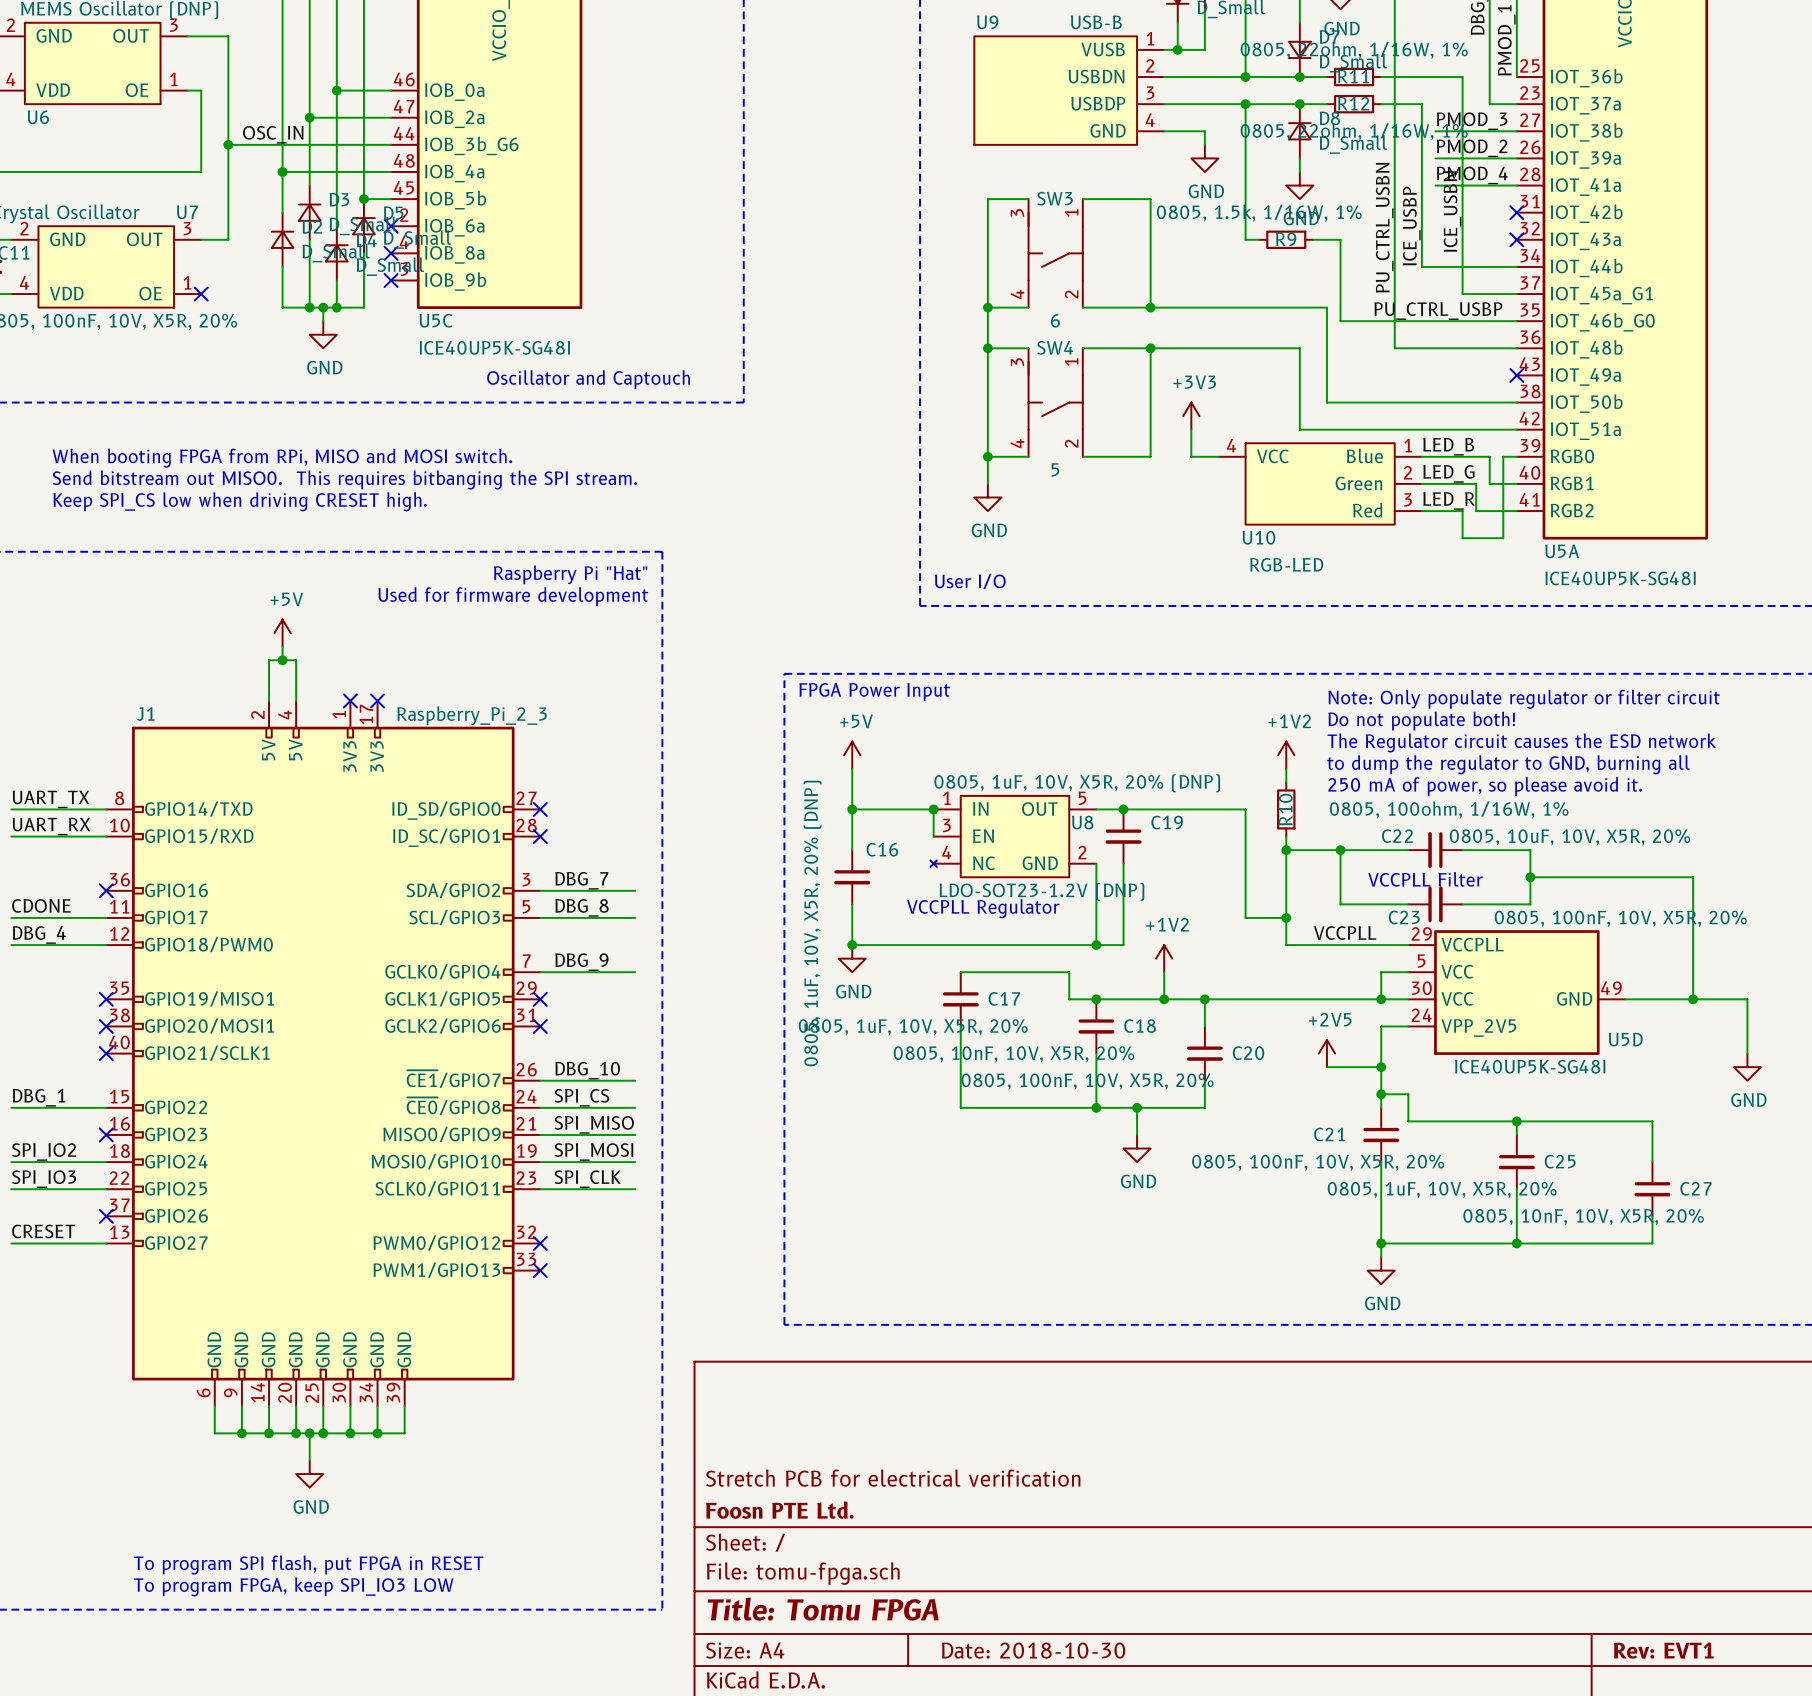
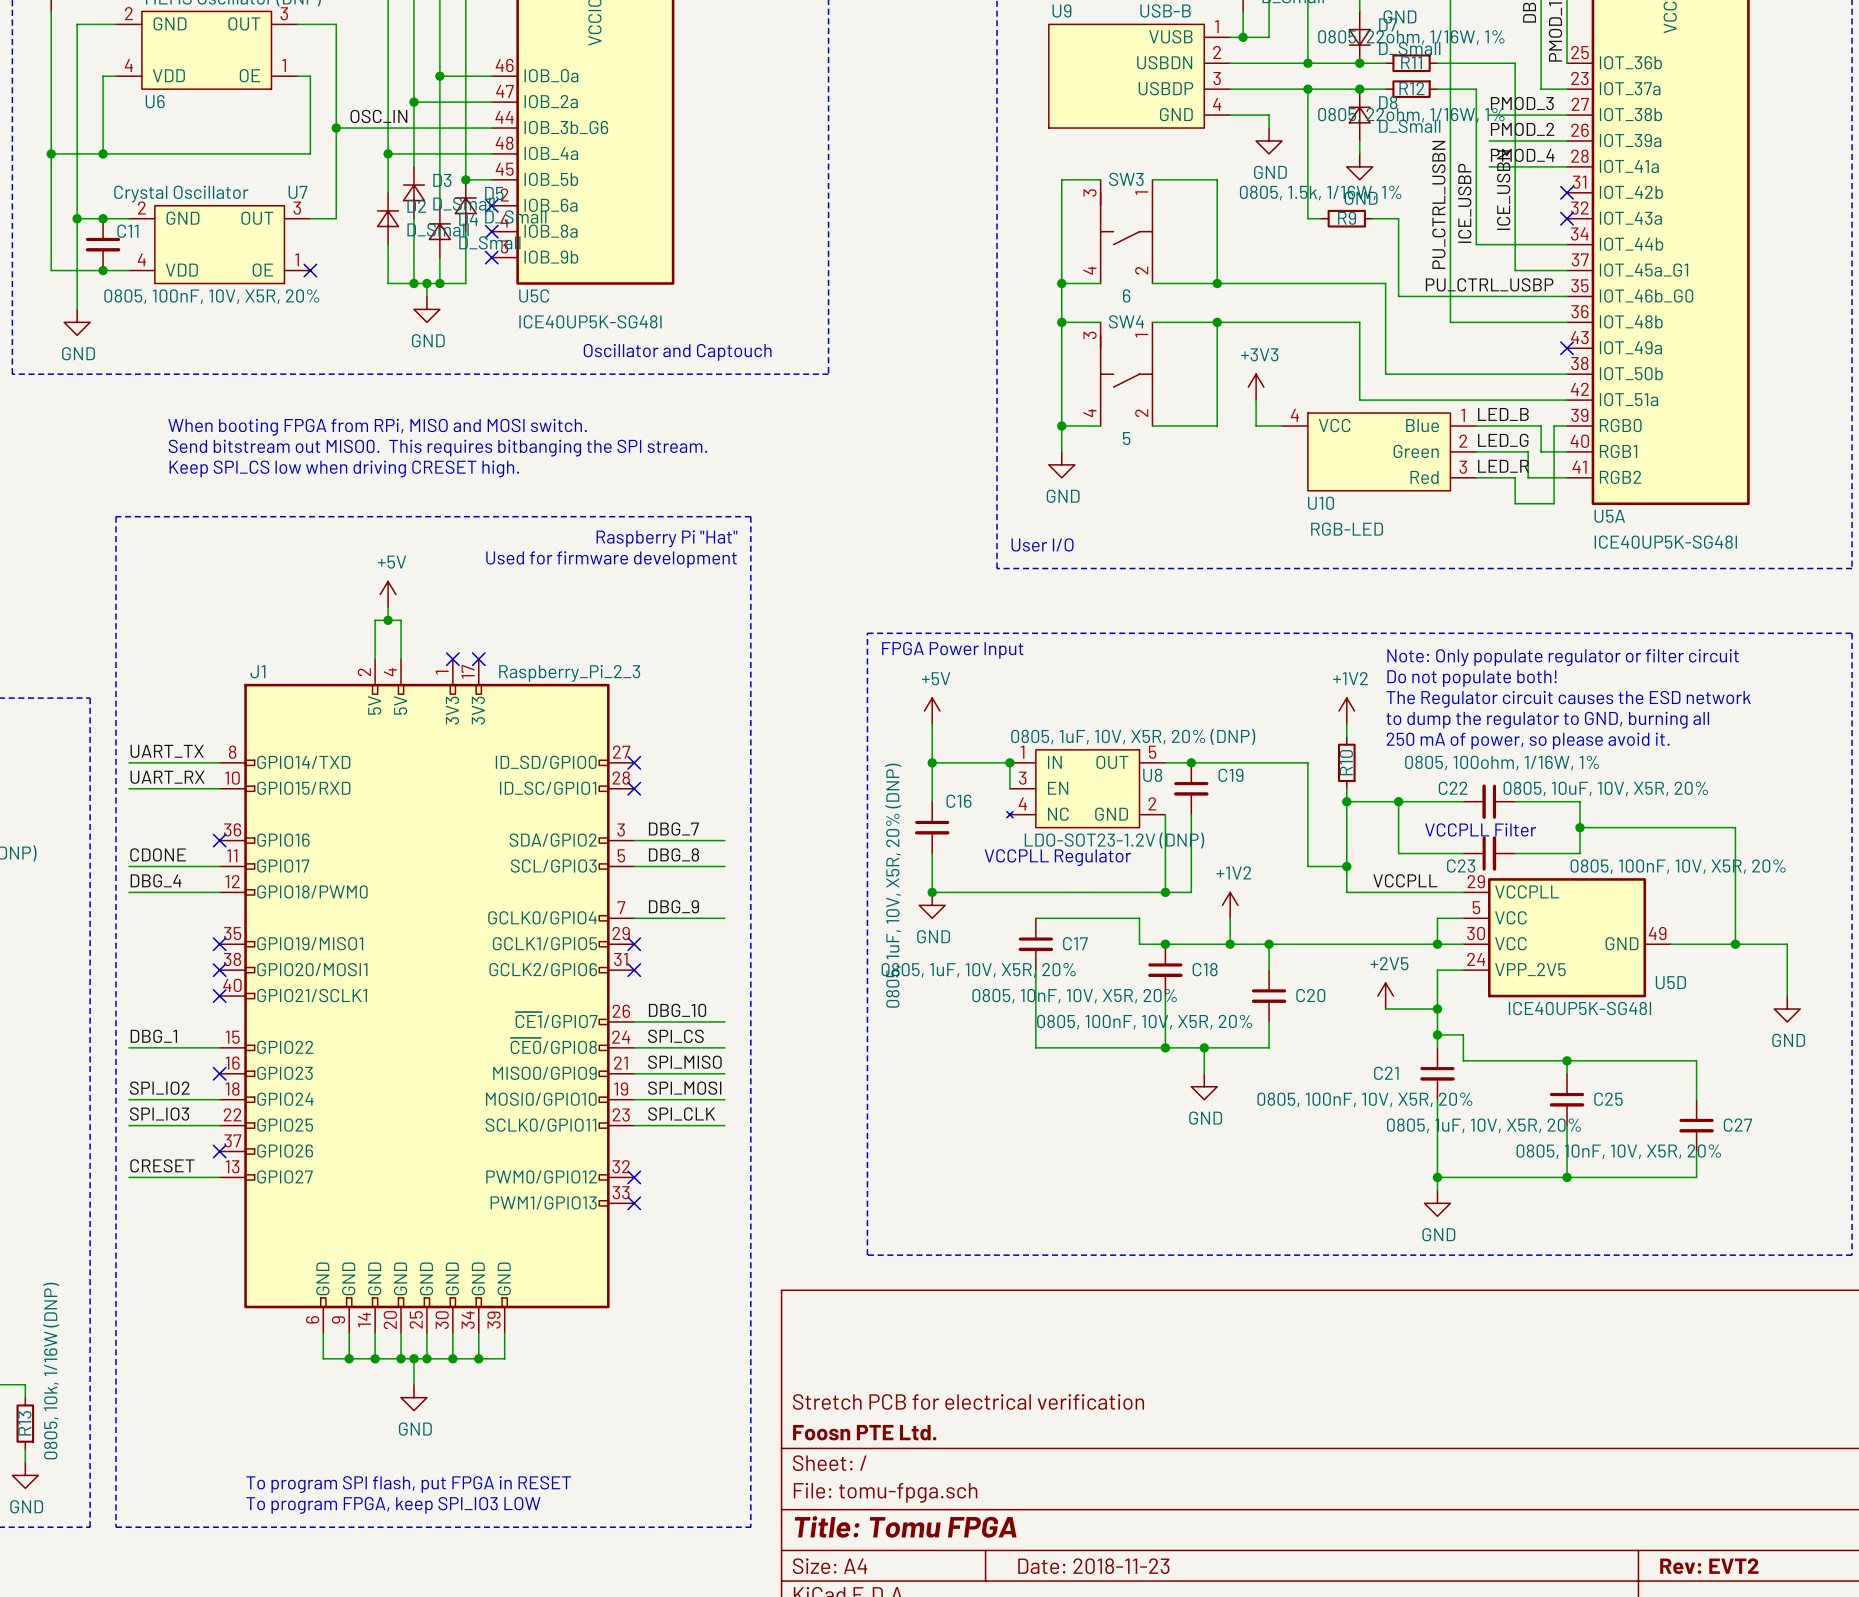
title block: Date: 2018-10-30 (1033, 1650) -> Date: 2018-11-23 (1093, 1566)
title block: Rev: EVT1 (1663, 1650) -> Rev: EVT2 (1709, 1566)

